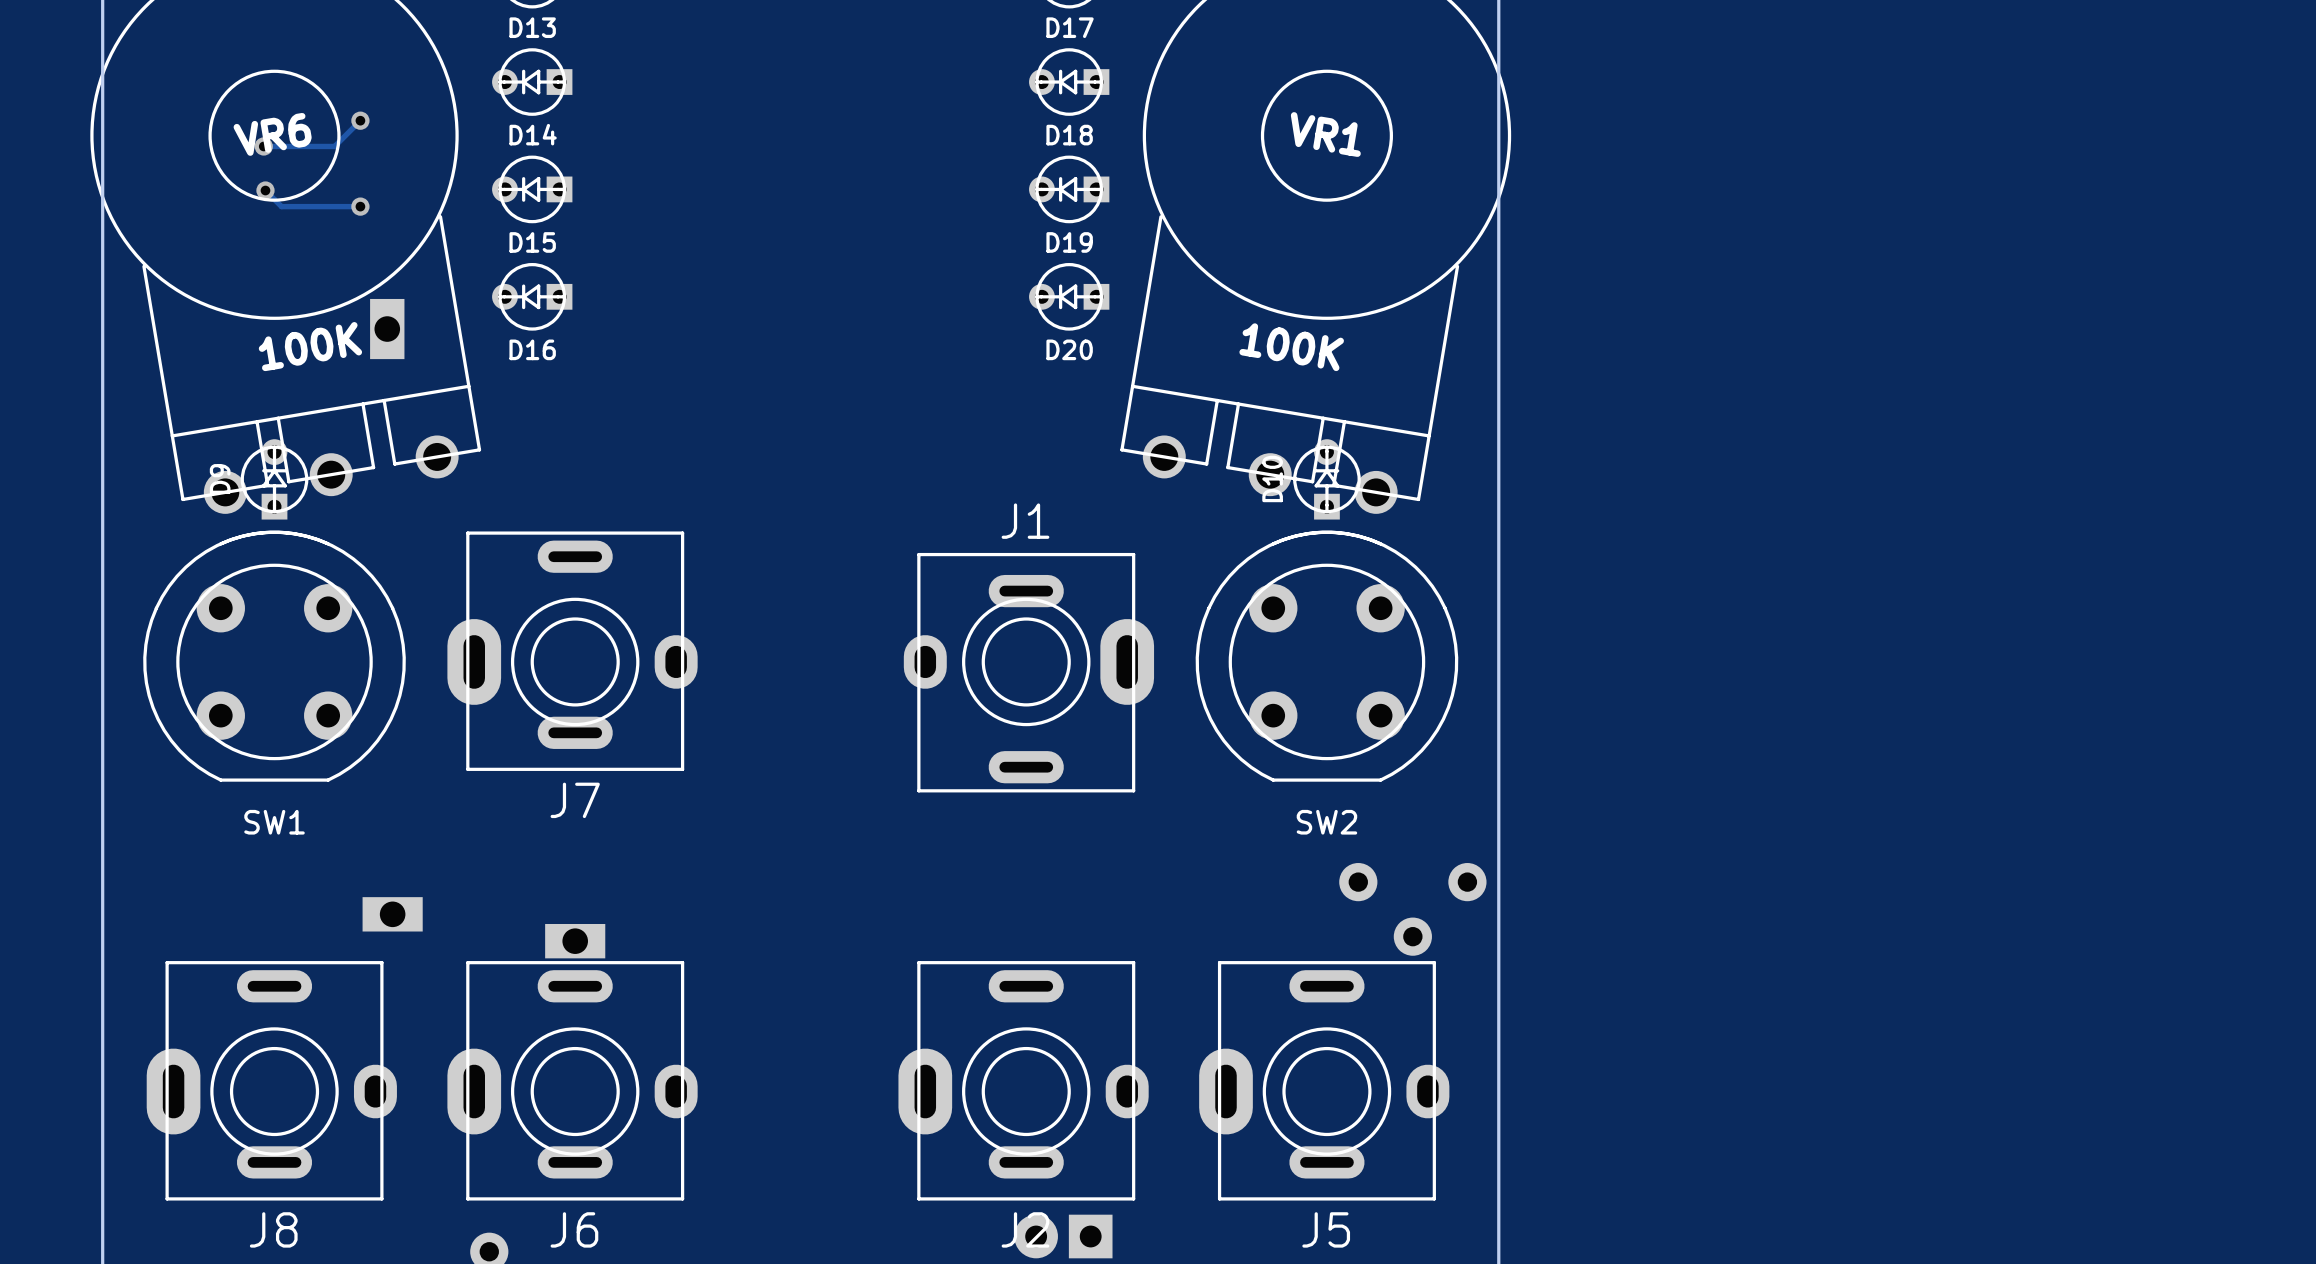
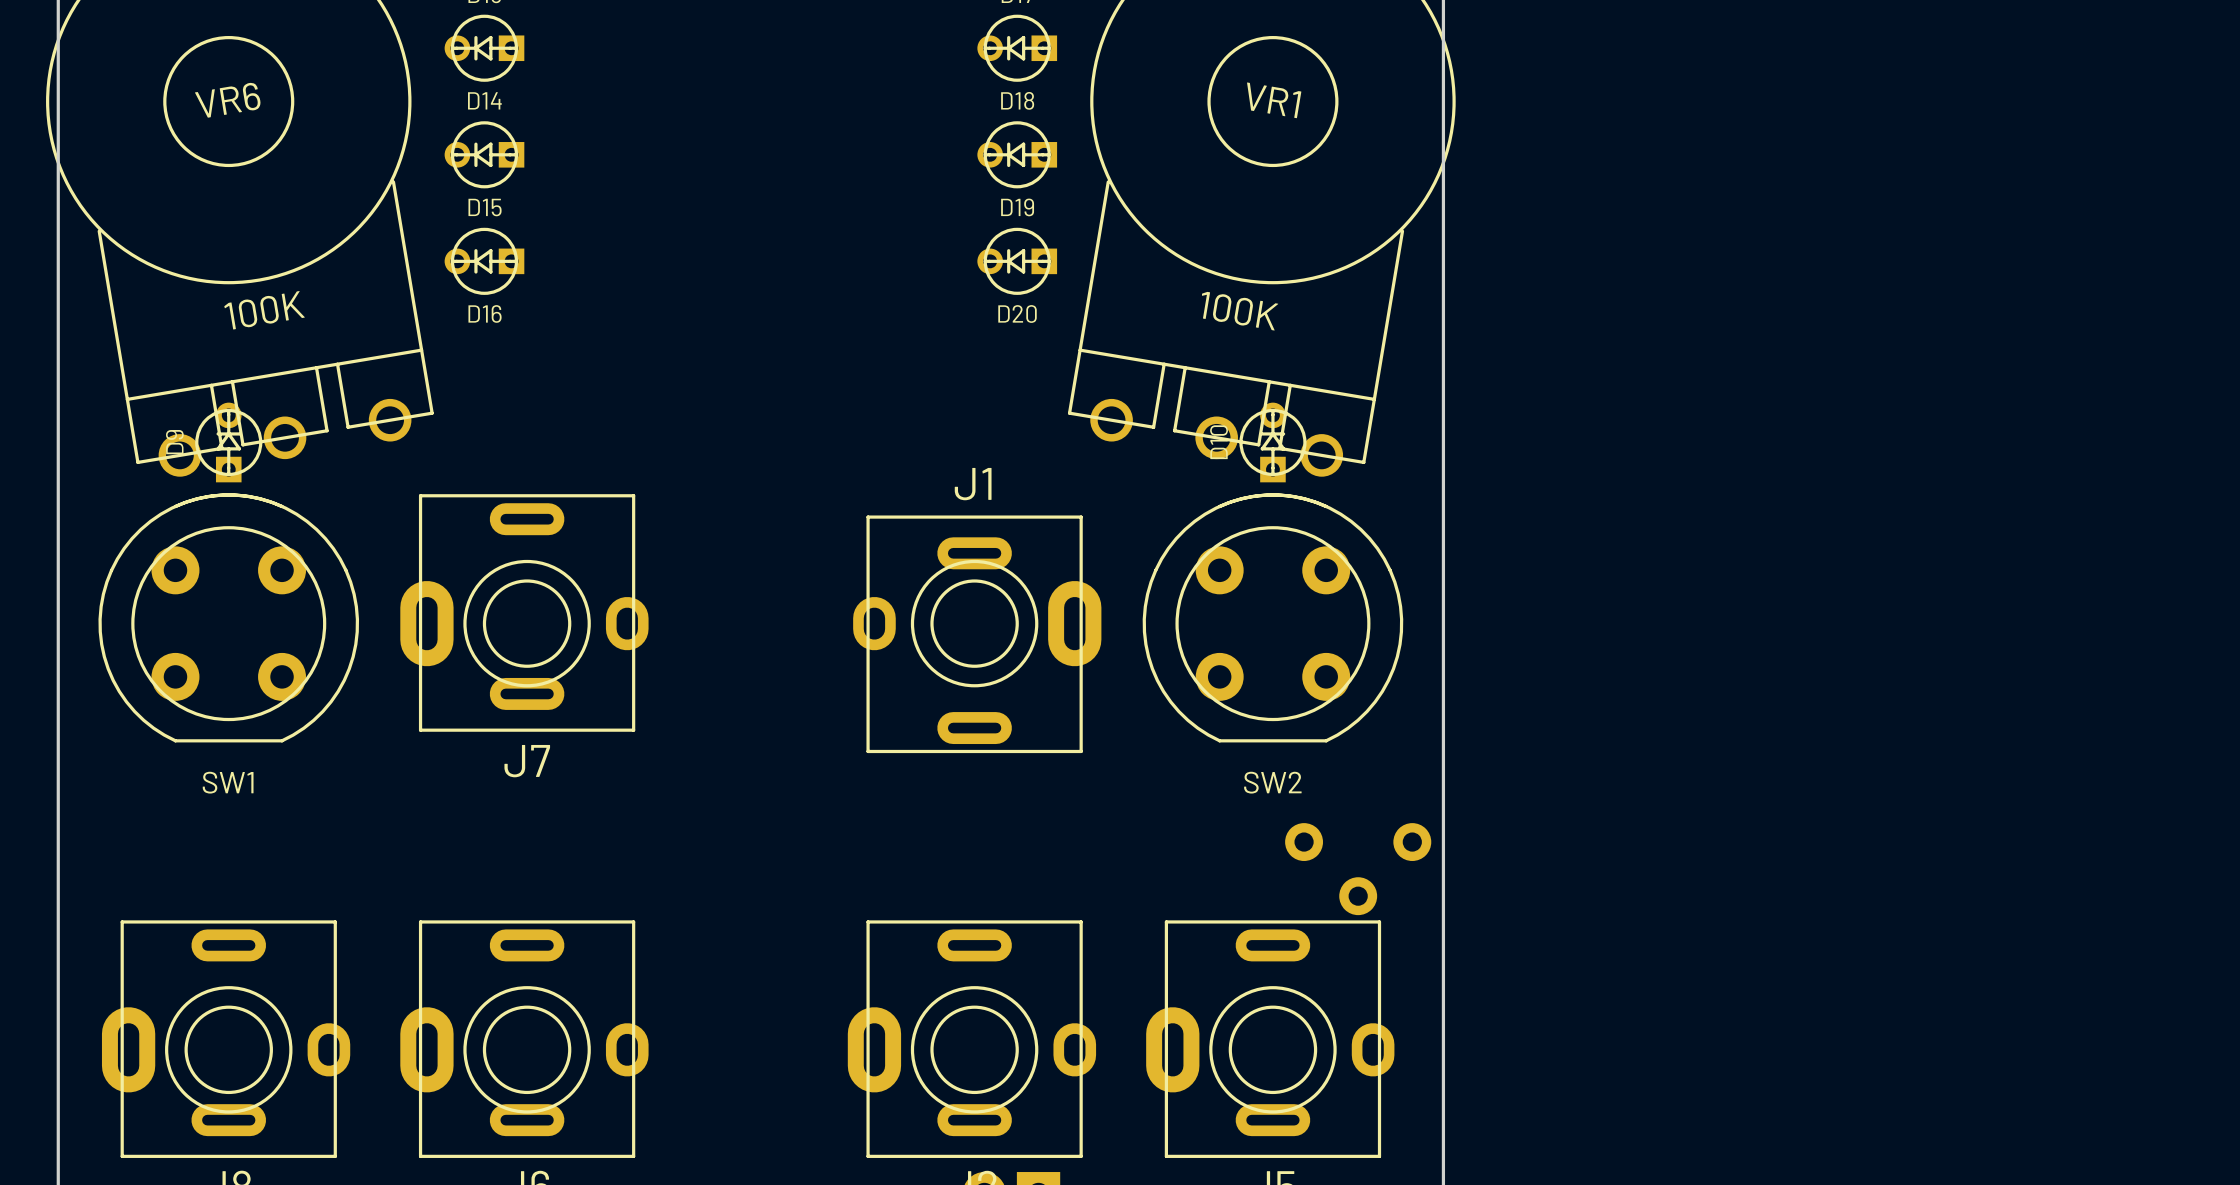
track: (360, 120) (334, 146) (263, 146) -> none
via: (360, 120) -> none
via: (263, 146) -> none
track: (265, 190) (281, 206) (360, 206) -> none
via: (265, 190) -> none
via: (360, 206) -> none
part: (387, 329) -> none
part: (392, 914) -> none
part: (575, 941) -> none

